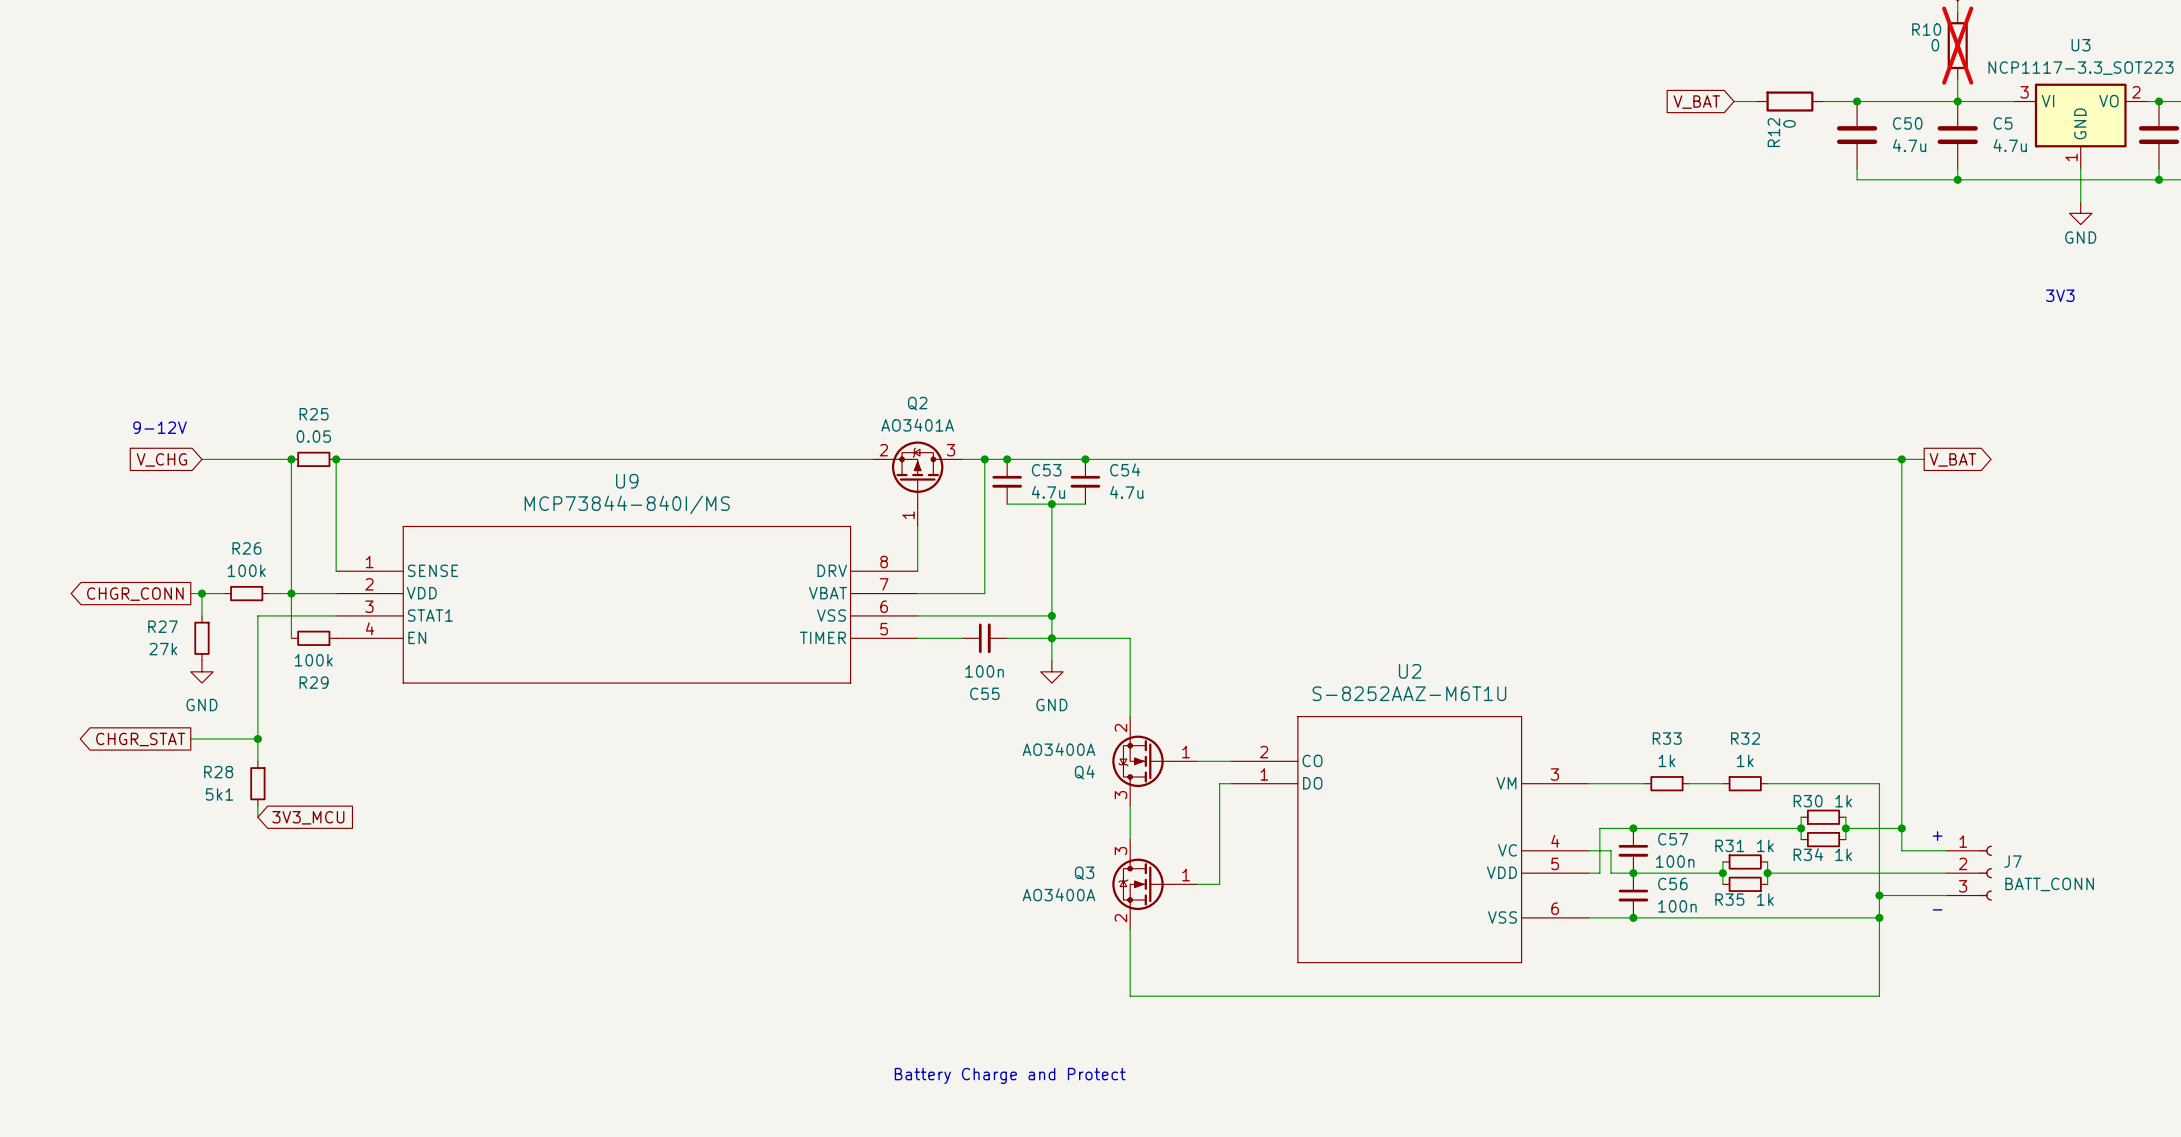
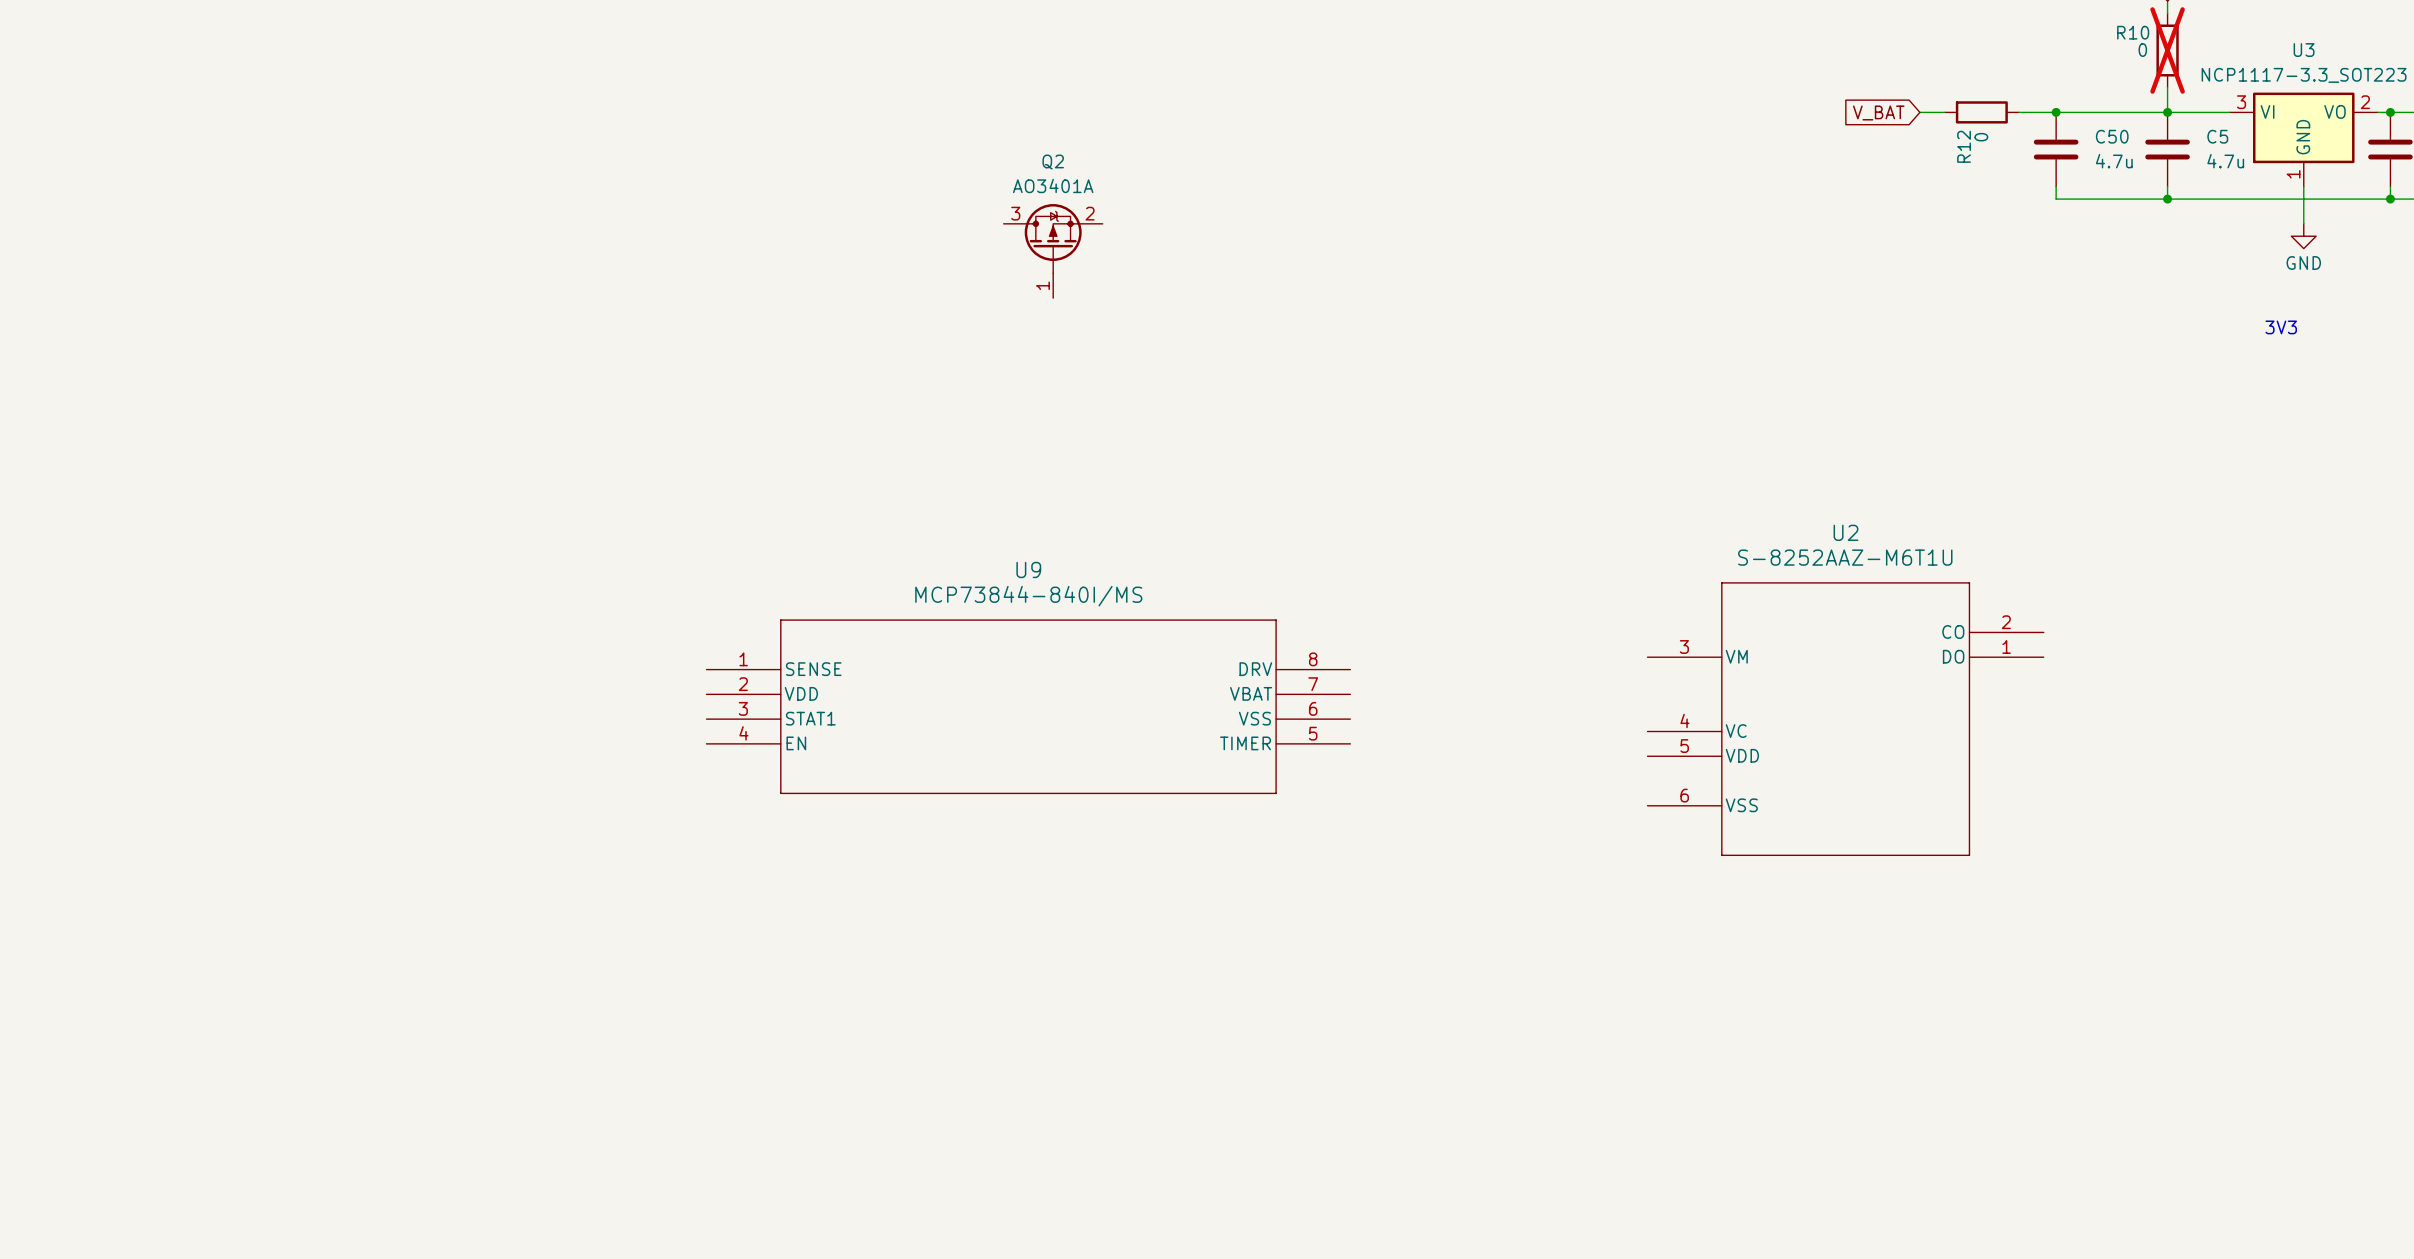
text: 9-12V (160, 427) -> none
global label: V_CHG (161, 459) -> none
wire: (201, 459) (291, 459) (291, 638) -> none
junction: (291, 459) -> none
R25: 0.05 (313, 459) -> none
junction: (336, 459) -> none
wire: (872, 459) (336, 459) (336, 571) -> none
wire: (962, 459) (1924, 459) -> none
wire: (984, 459) (984, 593) (917, 593) -> none
junction: (984, 459) -> none
junction: (1007, 459) -> none
junction: (1085, 459) -> none
wire: (1901, 459) (1901, 850) (1946, 850) -> none
junction: (1901, 459) -> none
global label: V_BAT (1952, 459) -> none
Q2 flip: as is (917, 472) -> left-right (1053, 238)
C53: 4.7u (1007, 481) -> none
C54: 4.7u (1085, 481) -> none
Q2 position: (917, 483) -> (1053, 251)
wire: (1007, 504) (1085, 504) -> none
wire: (1051, 504) (1051, 660) -> none
junction: (1051, 504) -> none
wire: (917, 526) (917, 571) -> none
wire: (190, 593) (224, 593) -> none
wire: (201, 593) (201, 615) -> none
junction: (201, 593) -> none
R26: 100k (246, 593) -> none
wire: (269, 593) (336, 593) -> none
junction: (291, 593) -> none
global label: CHGR_CONN (135, 594) -> none
U9 position: (626, 604) -> (1028, 706)
wire: (336, 615) (257, 615) (257, 761) -> none
wire: (917, 615) (1051, 615) -> none
junction: (1051, 615) -> none
R27: 27k (201, 638) -> none
R29: 100k (313, 638) -> none
wire: (917, 638) (962, 638) -> none
C55: 100n (984, 638) -> none
wire: (1007, 638) (1130, 638) (1130, 716) -> none
junction: (1051, 638) -> none
power symbol: GND (201, 671) -> none
power symbol: GND (1051, 671) -> none
wire: (190, 738) (257, 738) -> none
junction: (257, 738) -> none
global label: CHGR_STAT (140, 739) -> none
Q4: AO3400A (1154, 761) -> none
wire: (1197, 761) (1230, 761) -> none
R28: 5k1 (257, 783) -> none
wire: (1230, 783) (1219, 783) (1219, 884) (1197, 884) -> none
wire: (1588, 783) (1644, 783) -> none
R33: 1k (1666, 783) -> none
wire: (1689, 783) (1722, 783) -> none
R32: 1k (1745, 783) -> none
wire: (1767, 783) (1879, 783) (1879, 996) (1130, 996) (1130, 929) -> none
wire: (257, 806) (257, 817) -> none
wire: (1130, 806) (1130, 839) -> none
global label: 3V3_MCU (308, 817) -> none
wire: (1801, 817) (1801, 839) -> none
R30: 1k (1823, 817) -> none
wire: (1845, 817) (1845, 839) -> none
junction: (1633, 828) -> none
wire: (1801, 828) (1599, 828) (1599, 873) (1588, 873) -> none
junction: (1801, 828) -> none
wire: (1845, 828) (1901, 828) -> none
junction: (1845, 828) -> none
junction: (1901, 828) -> none
text: + (1937, 836) -> none
U2 flip: as is (1409, 839) -> left-right (1845, 719)
U2 position: (1409, 839) -> (1845, 719)
R34: 1k (1823, 839) -> none
wire: (1588, 850) (1611, 850) (1611, 873) (1722, 873) -> none
C57: 100n (1633, 850) -> none
wire: (1722, 861) (1722, 884) -> none
R31: 1k (1745, 861) -> none
wire: (1767, 861) (1767, 884) -> none
junction: (1633, 873) -> none
junction: (1722, 873) -> none
wire: (1767, 873) (1946, 873) -> none
junction: (1767, 873) -> none
J7: BATT_CONN (1969, 873) -> none
Q3: AO3400A (1154, 884) -> none
R35: 1k (1745, 884) -> none
C56: 100n (1633, 895) -> none
wire: (1879, 895) (1946, 895) -> none
junction: (1879, 895) -> none
text: - (1937, 909) -> none
wire: (1588, 917) (1879, 917) -> none
junction: (1633, 917) -> none
junction: (1879, 917) -> none
text: Battery Charge and Protect (1010, 1075) -> none

